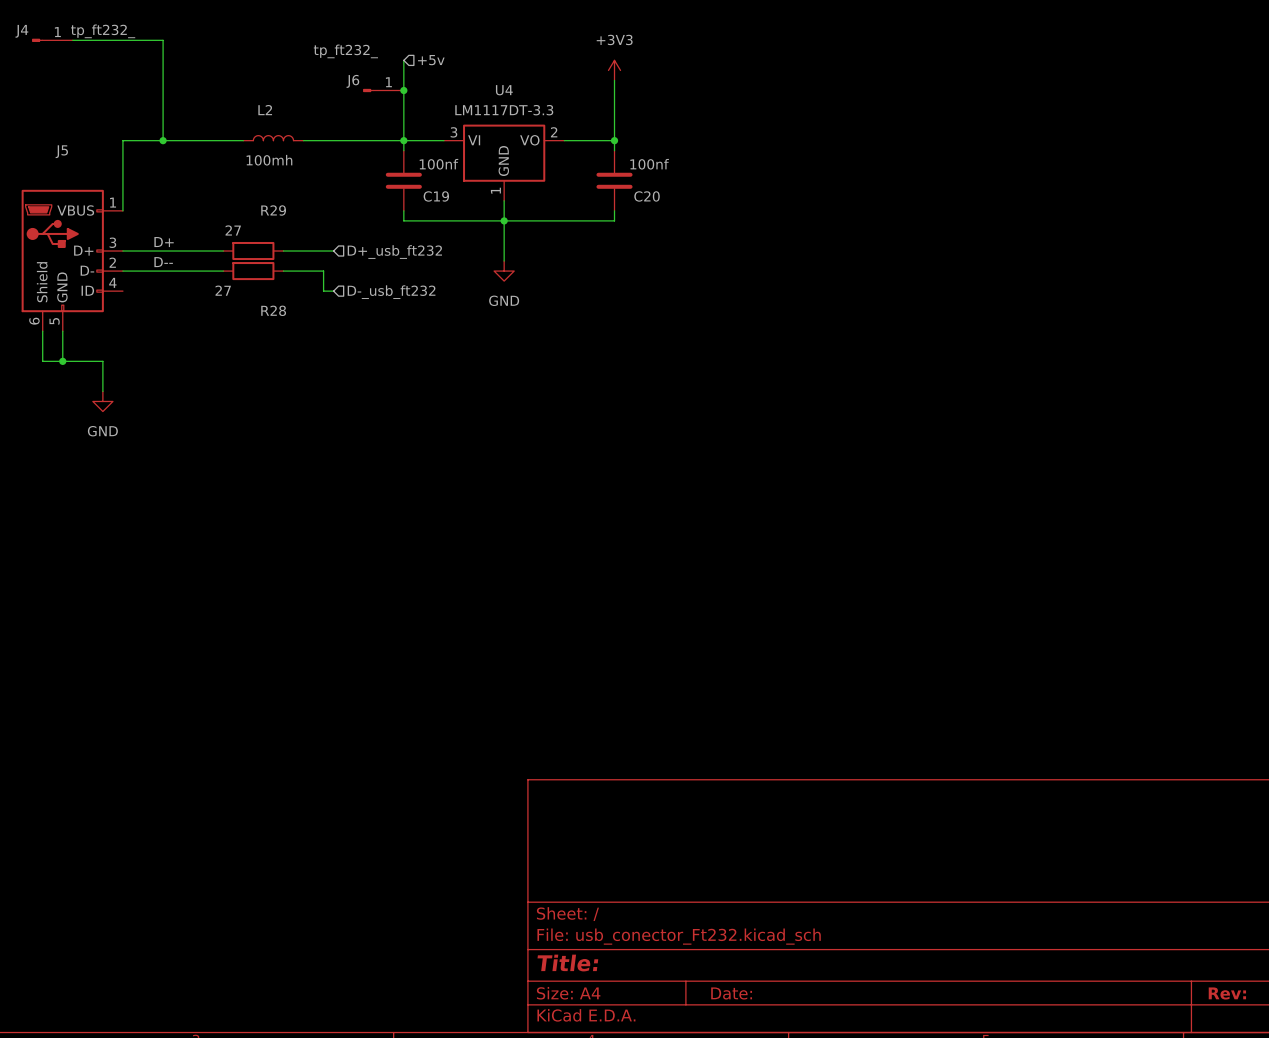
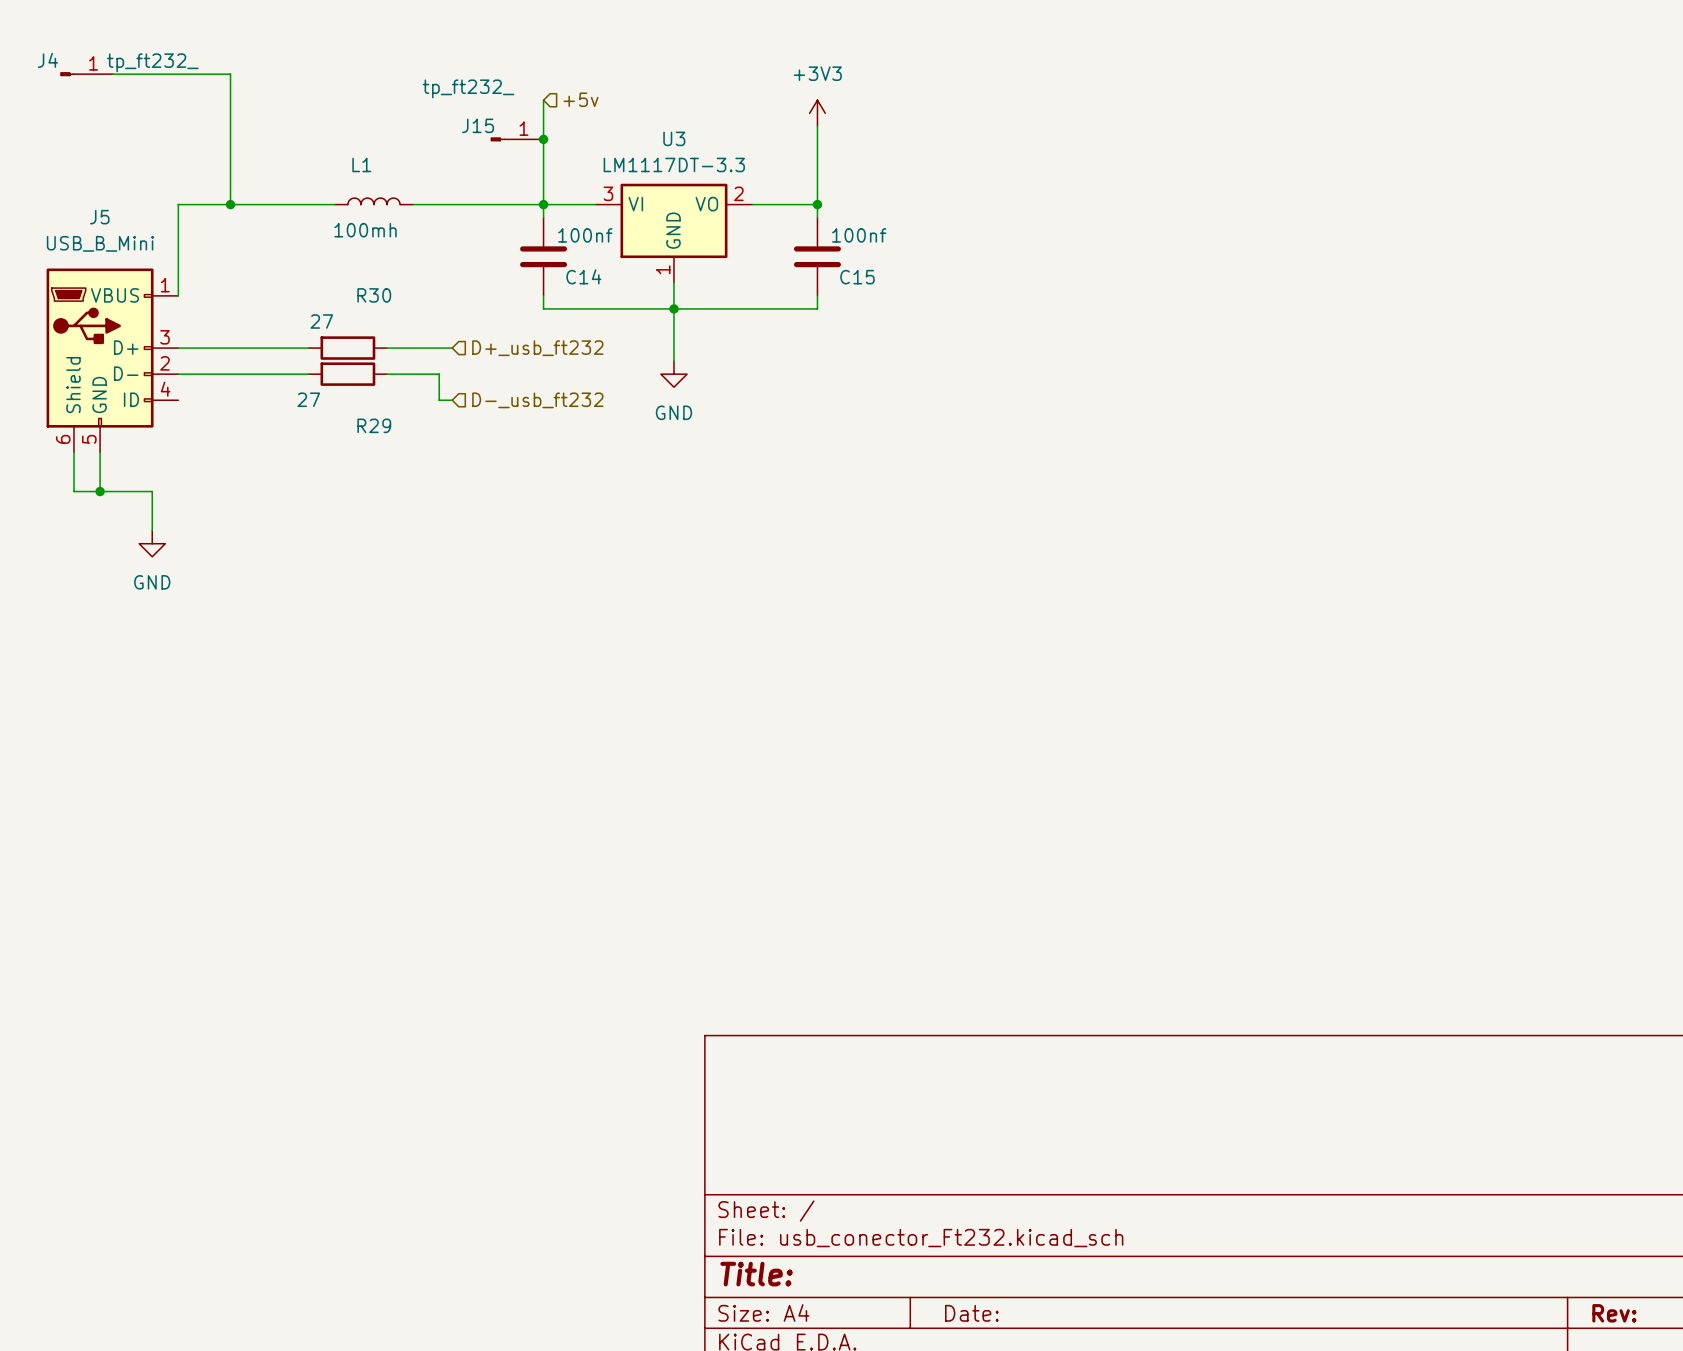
J6 name: J6 (352, 81) -> J15 (478, 125)
U4 name: U4 (504, 90) -> U3 (674, 138)
L2 name: L2 (265, 110) -> L1 (361, 164)
J5 value: none -> USB_B_Mini (100, 243)
C19 name: C19 (436, 196) -> C14 (583, 276)
C20 name: C20 (647, 196) -> C15 (857, 277)
R29 name: R29 (273, 210) -> R30 (374, 295)
label: D+ (164, 242) -> none
label: D-- (163, 262) -> none
R28 name: R28 (273, 310) -> R29 (374, 425)

